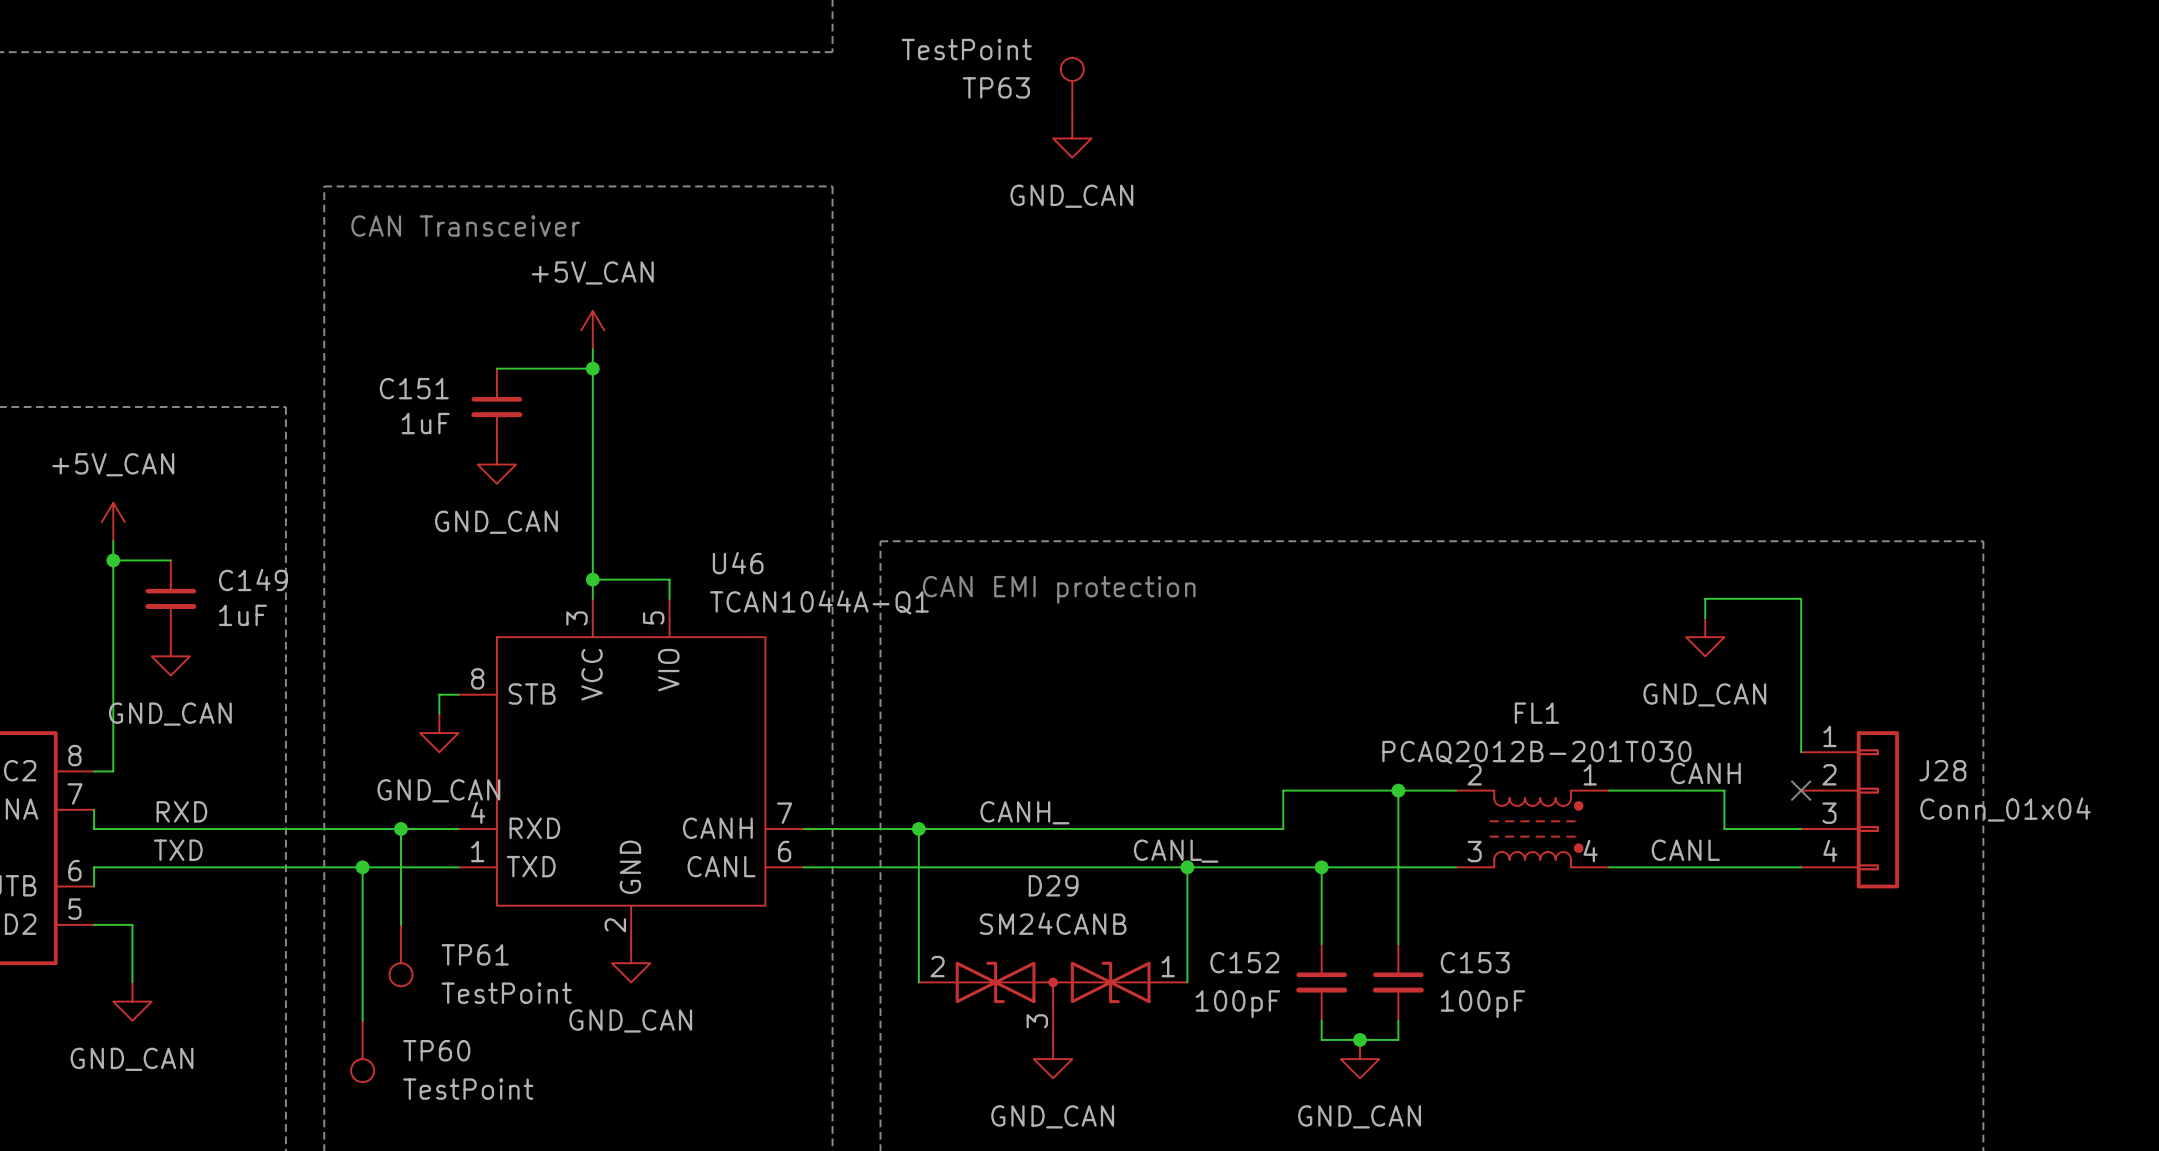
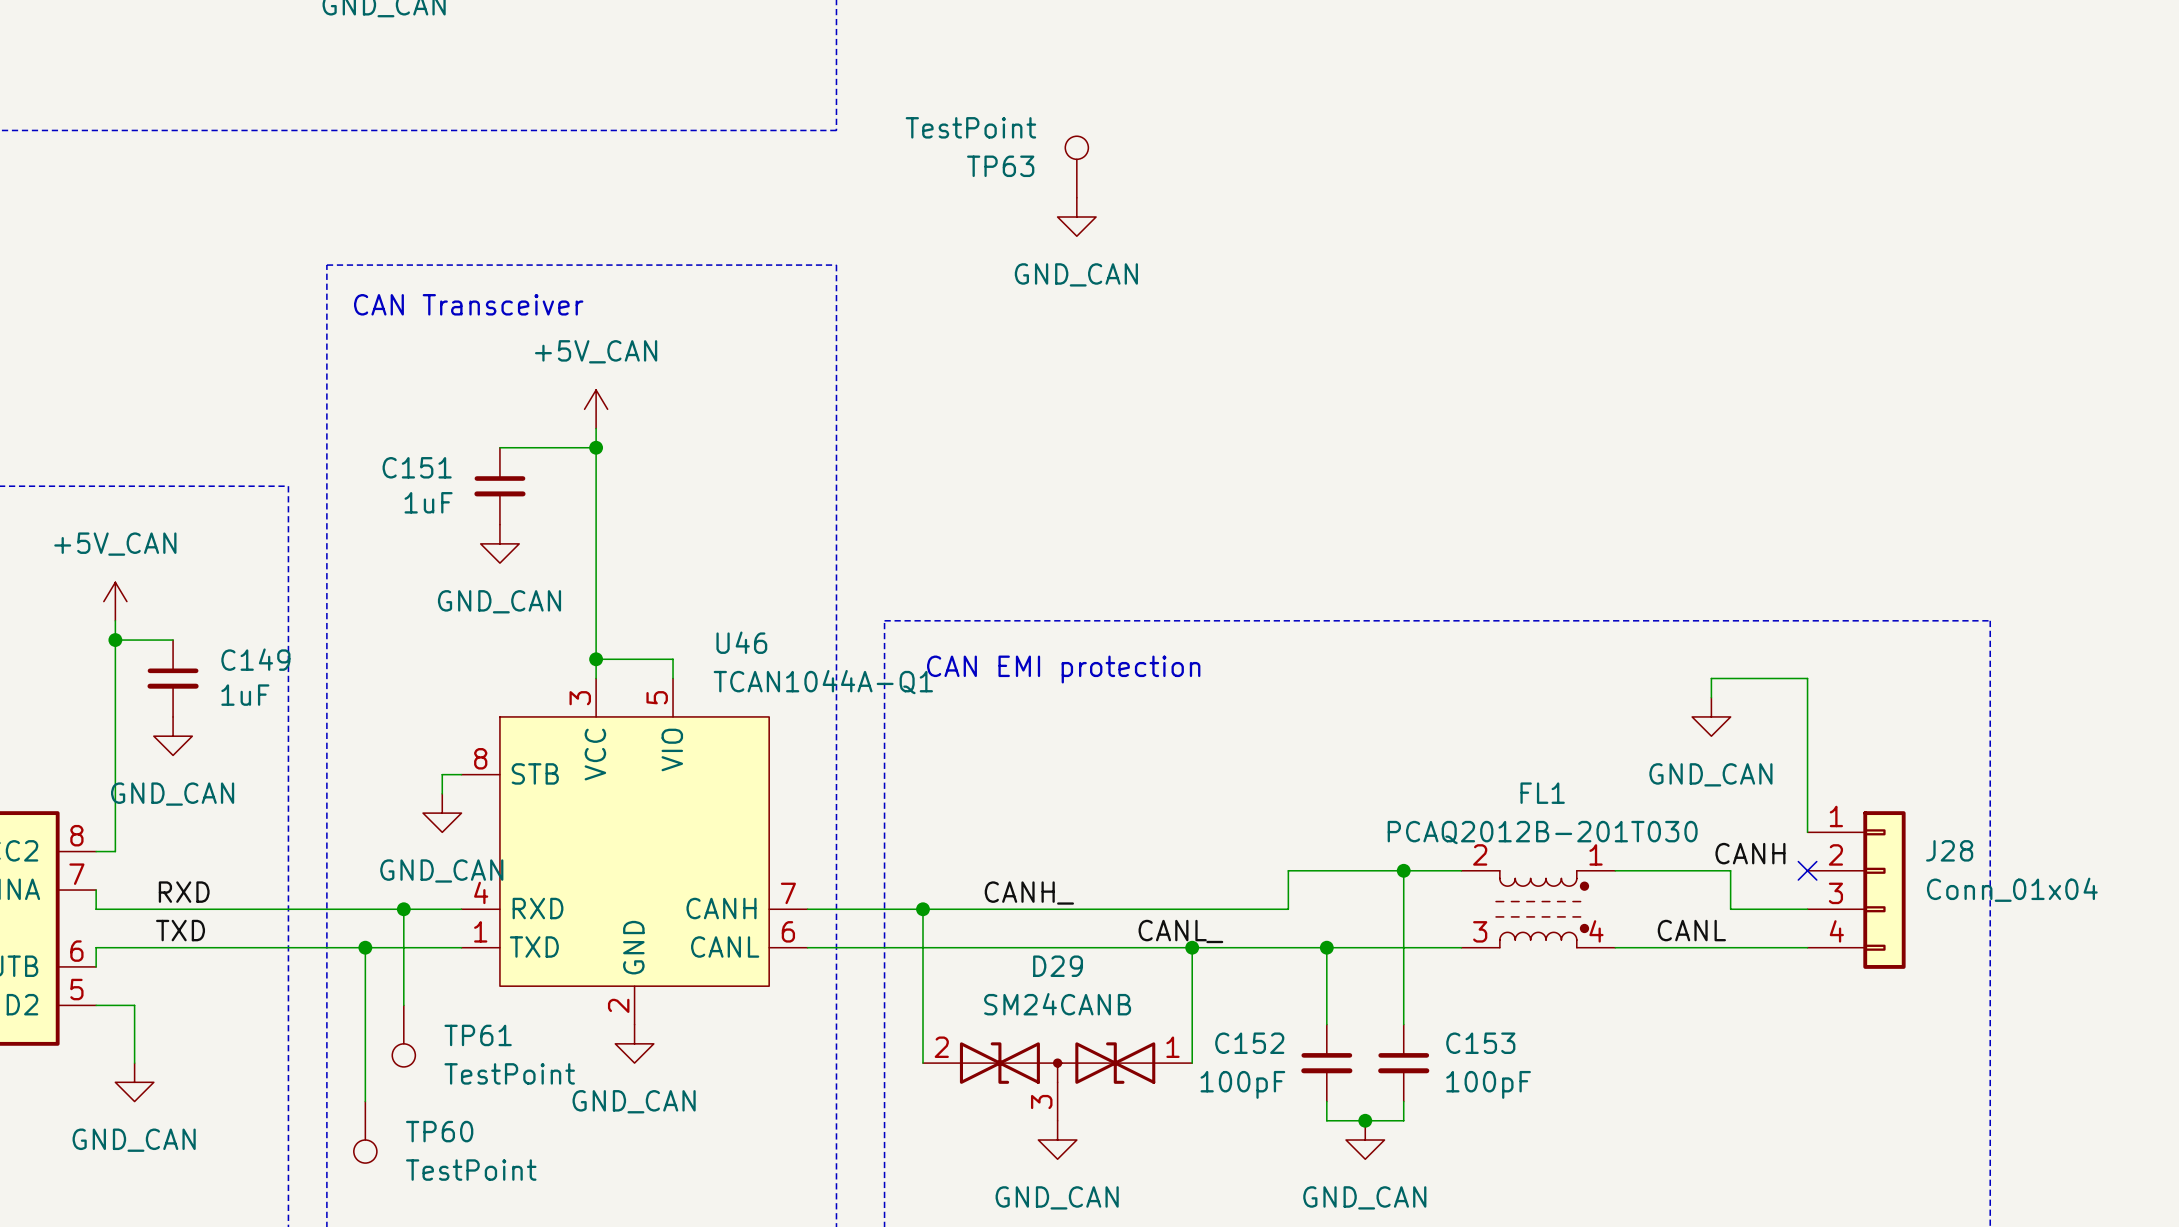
label position: CANH (1705, 773) -> CANH (1750, 853)

